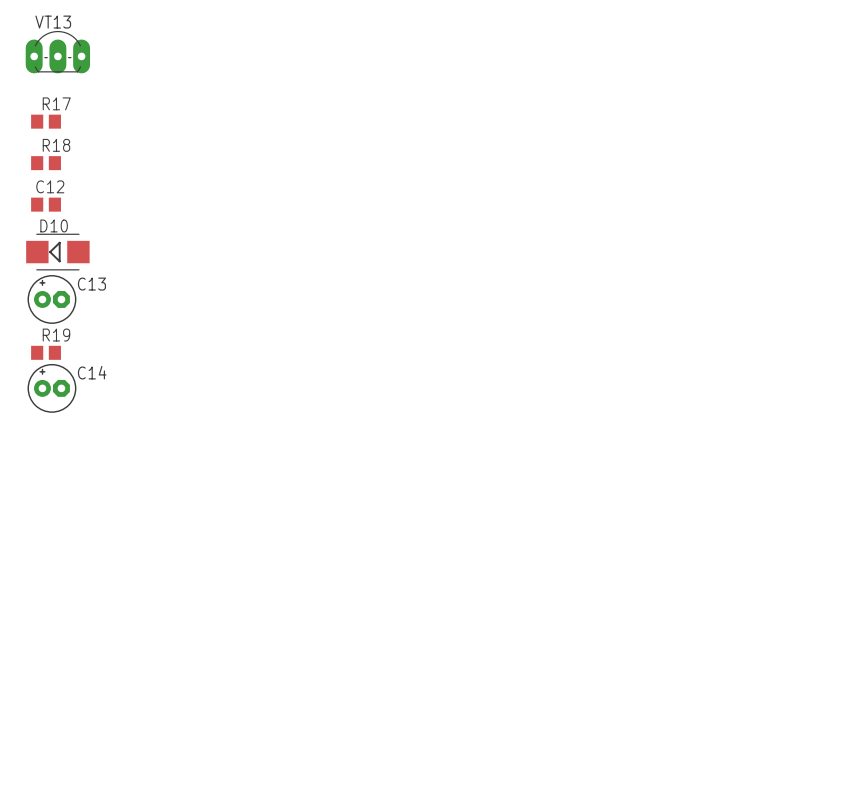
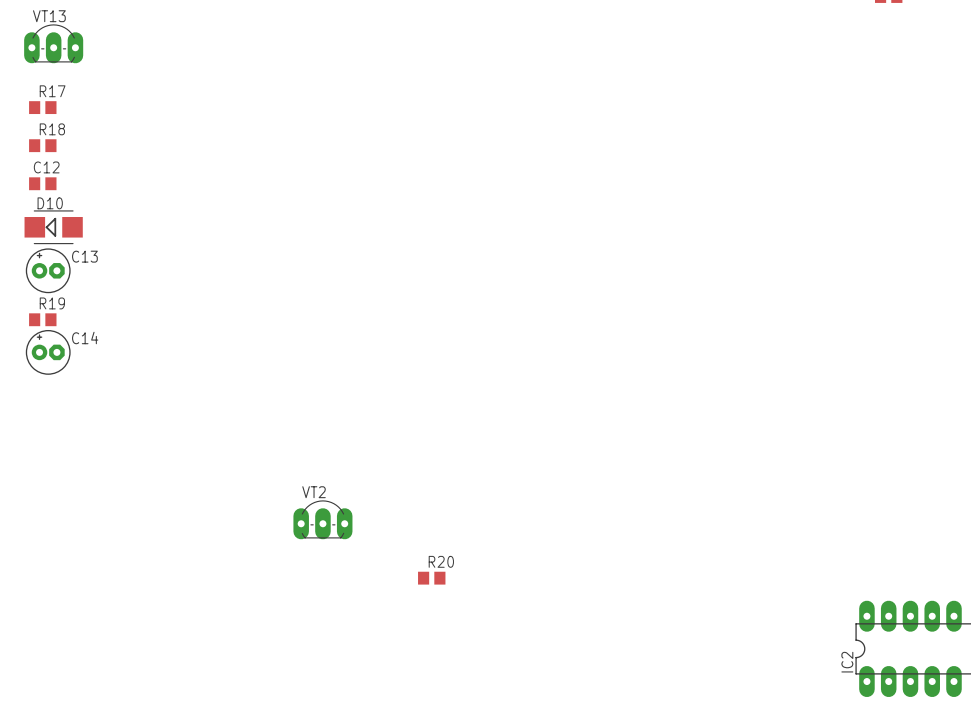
VT2: none -> (322, 519)
R20: none -> (431, 578)

